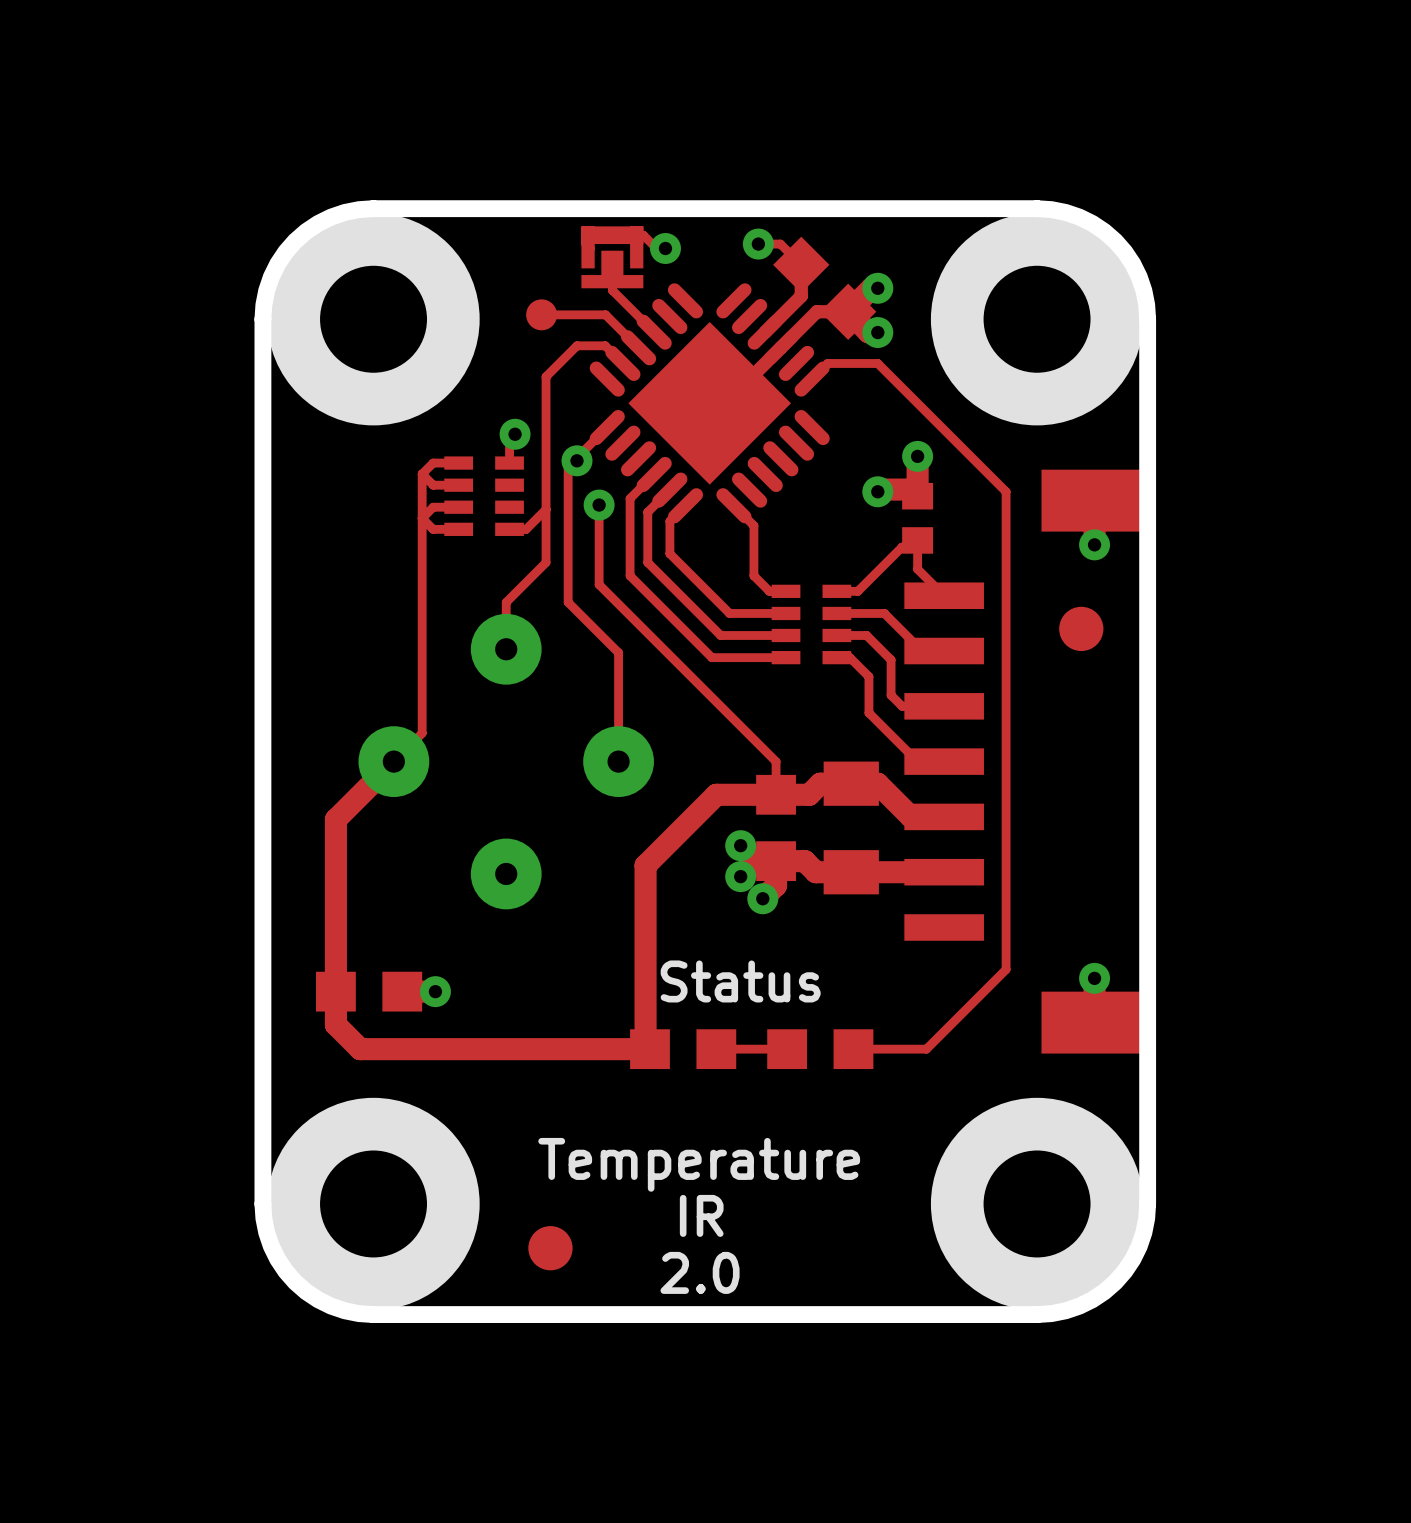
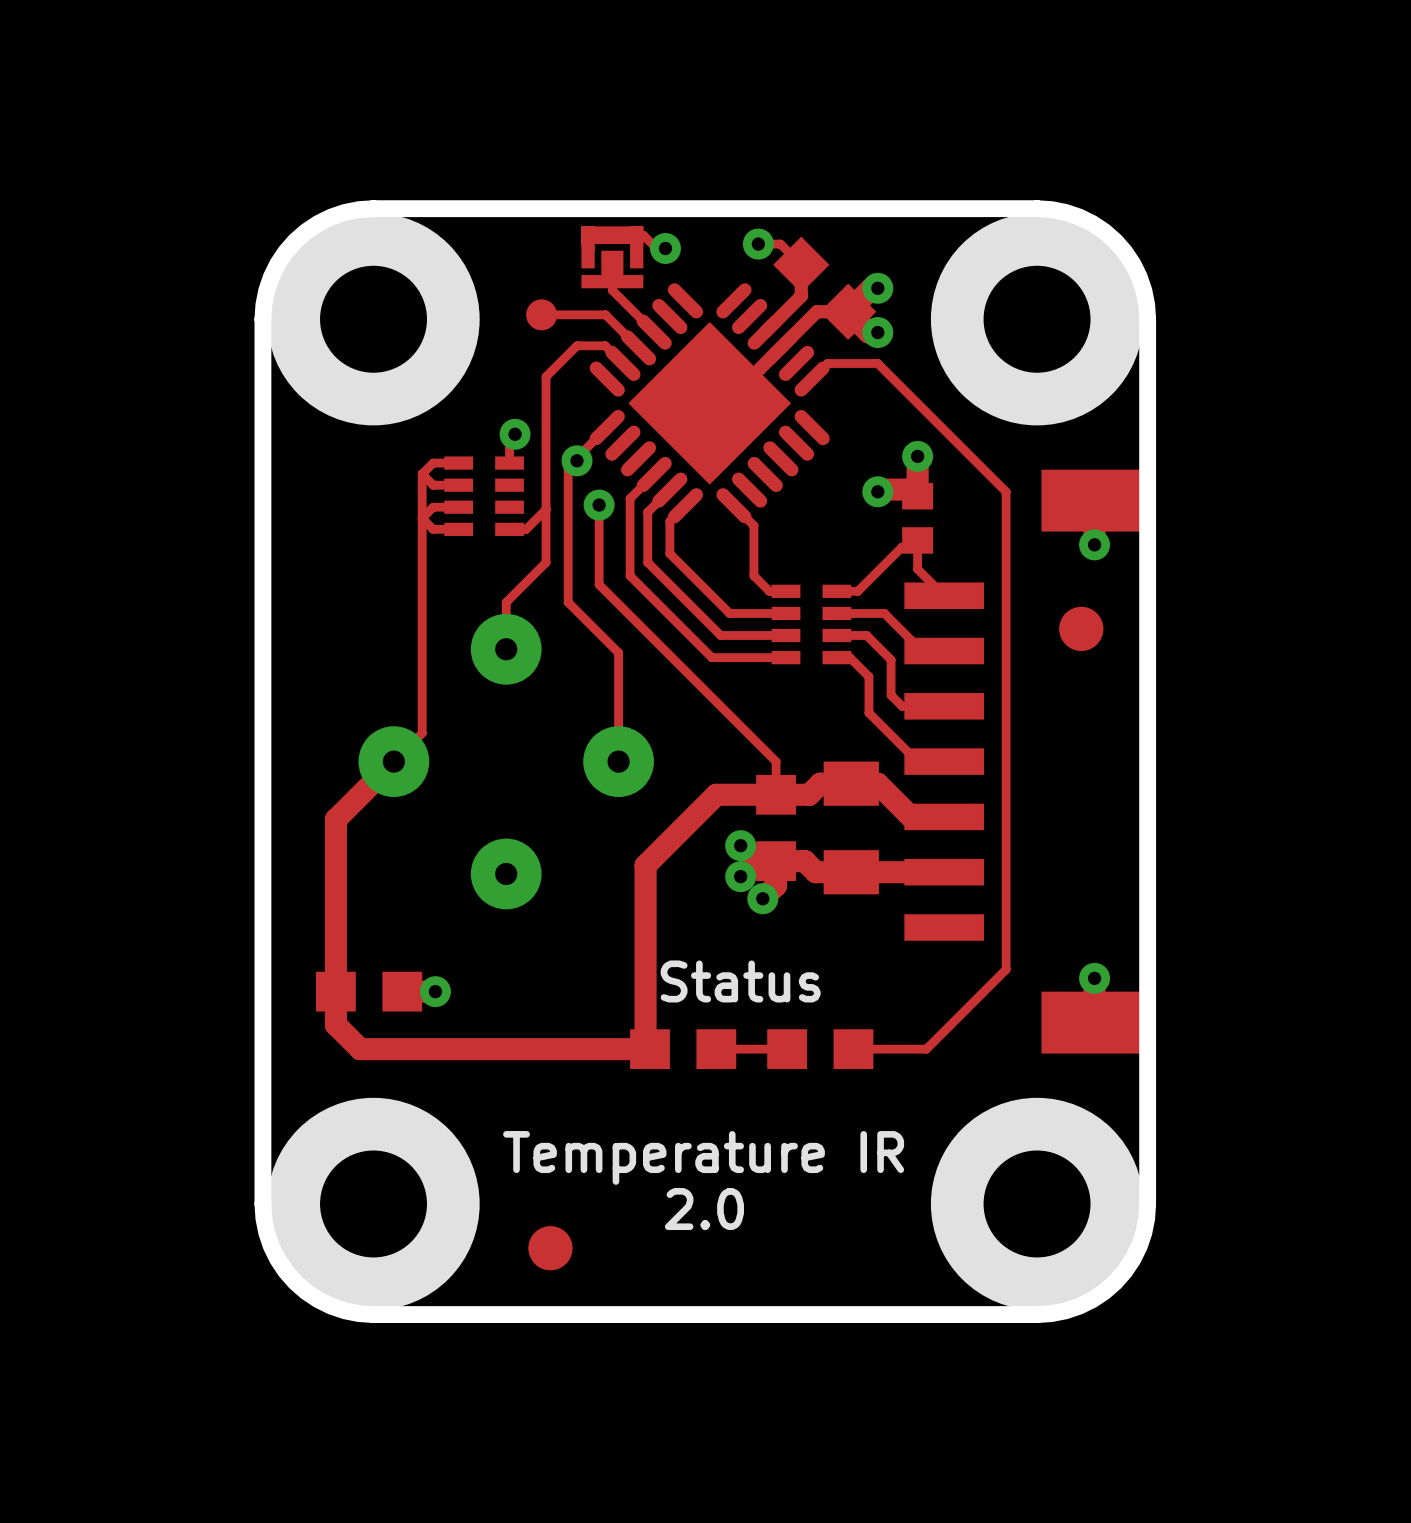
text: Temperature (699, 1164) -> Temperature IR (703, 1157)
text: IR (701, 1215) -> none
text position: 2.0 (700, 1272) -> 2.0 (704, 1209)

